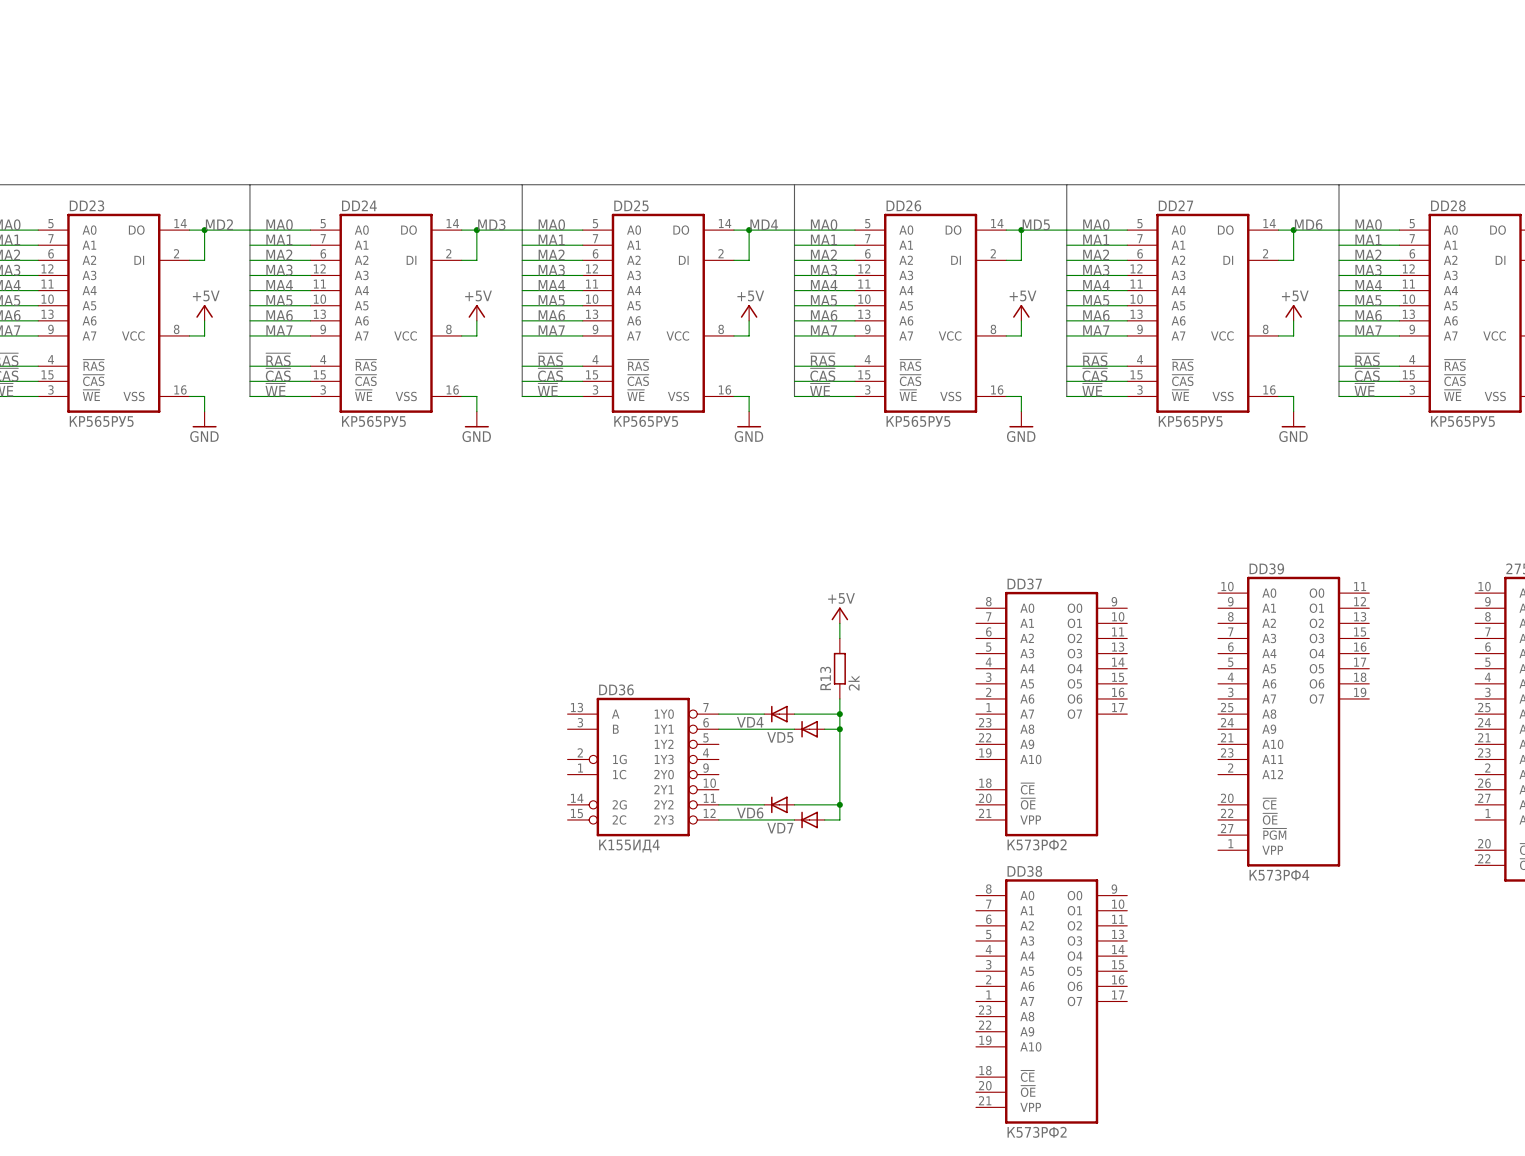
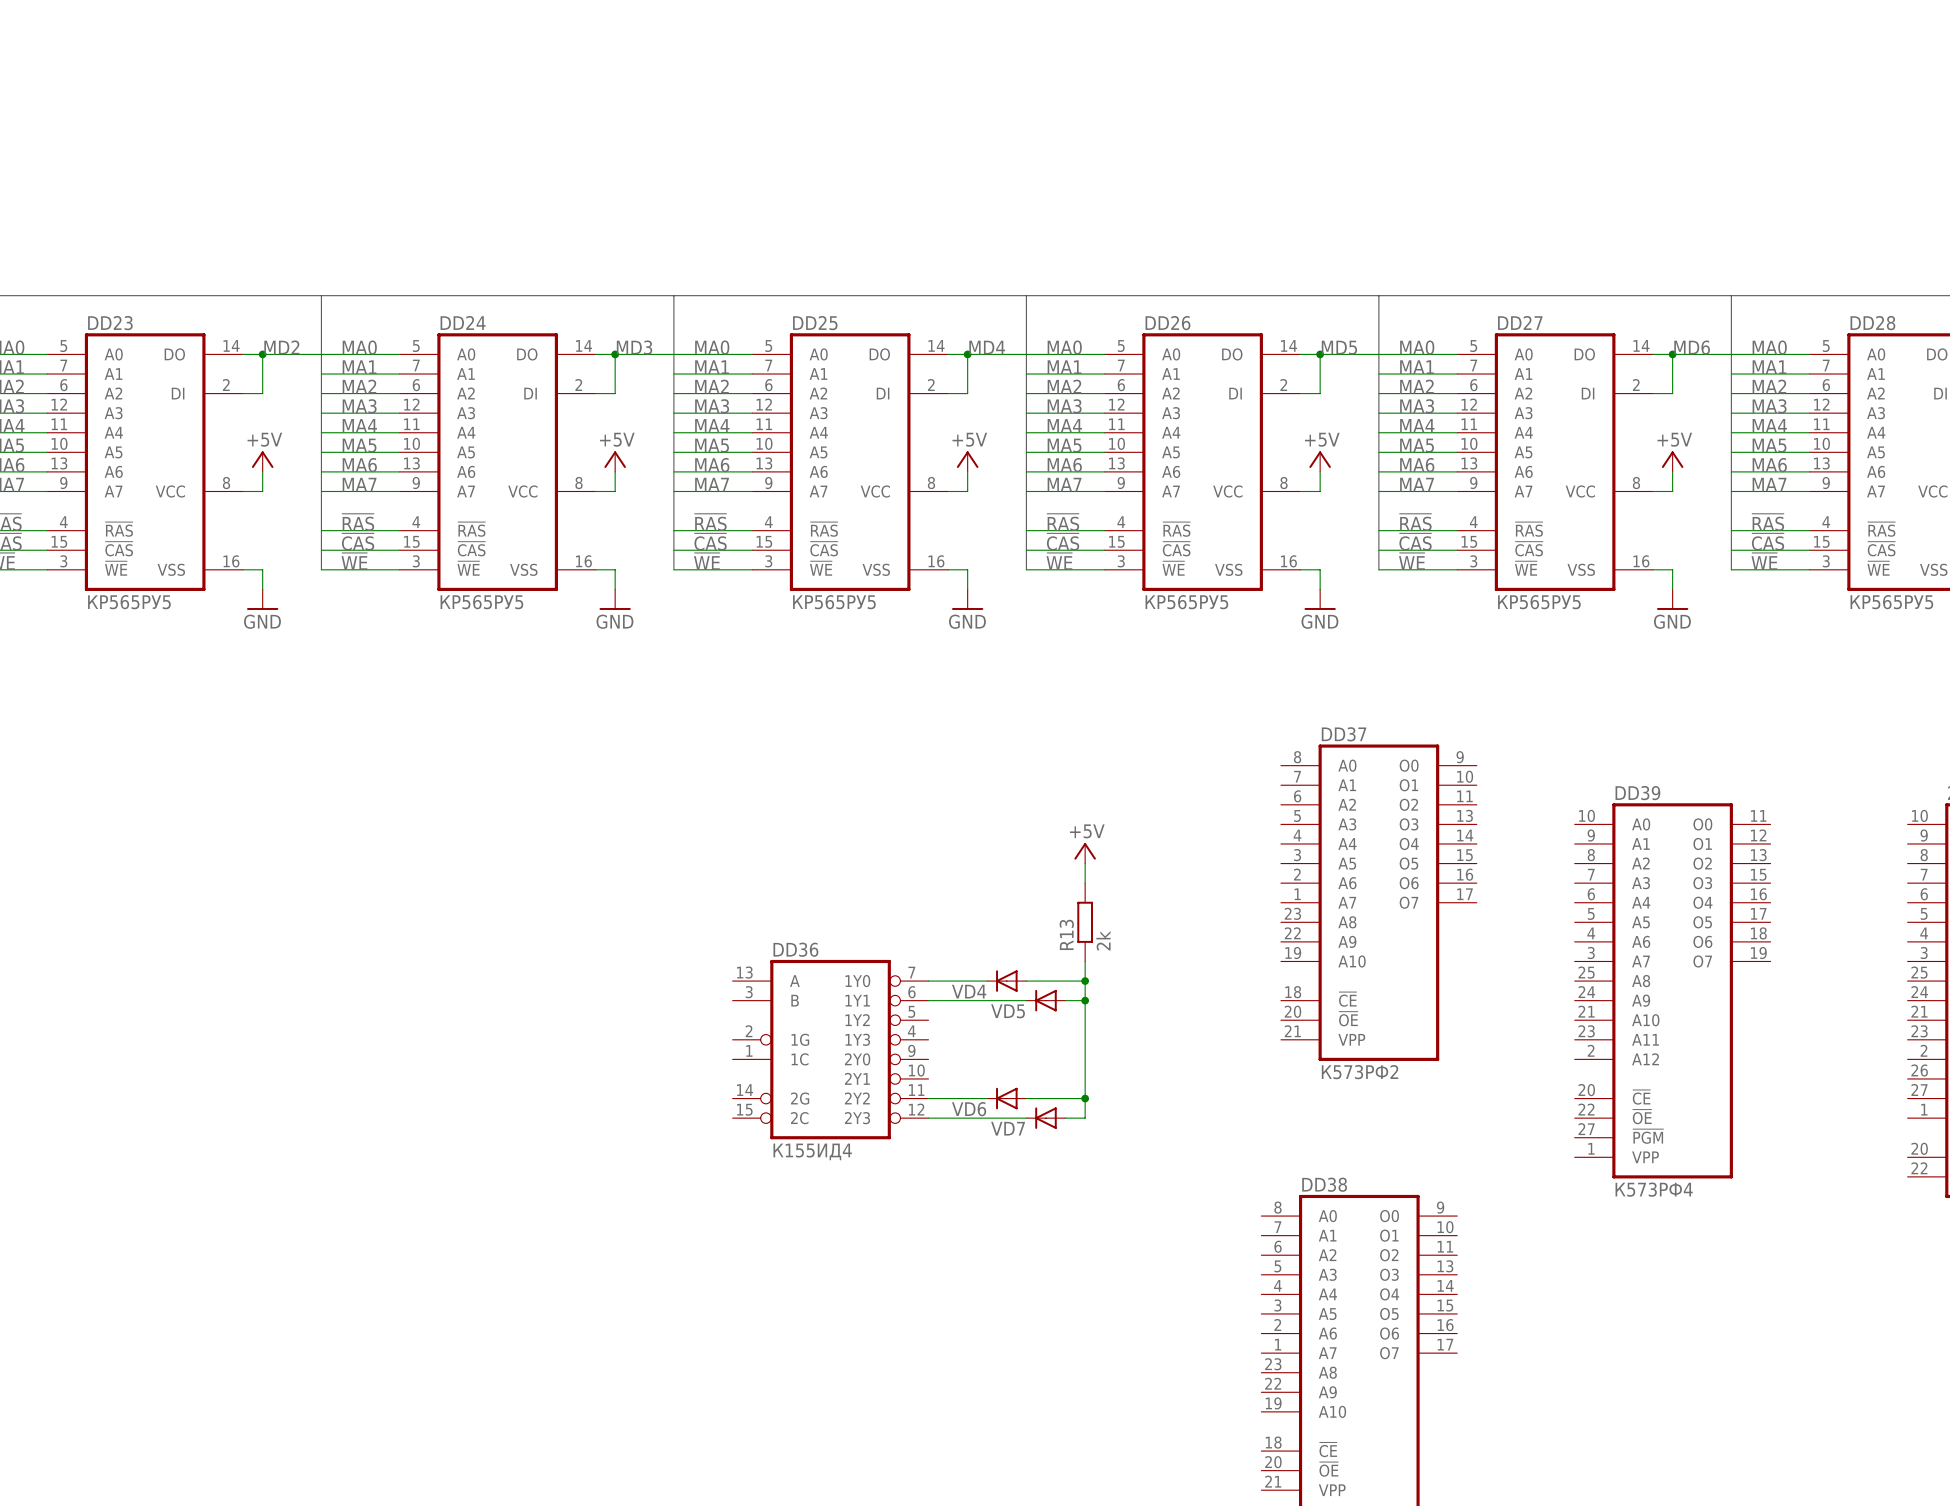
DD37 position: (1051, 714) -> (1378, 902)

